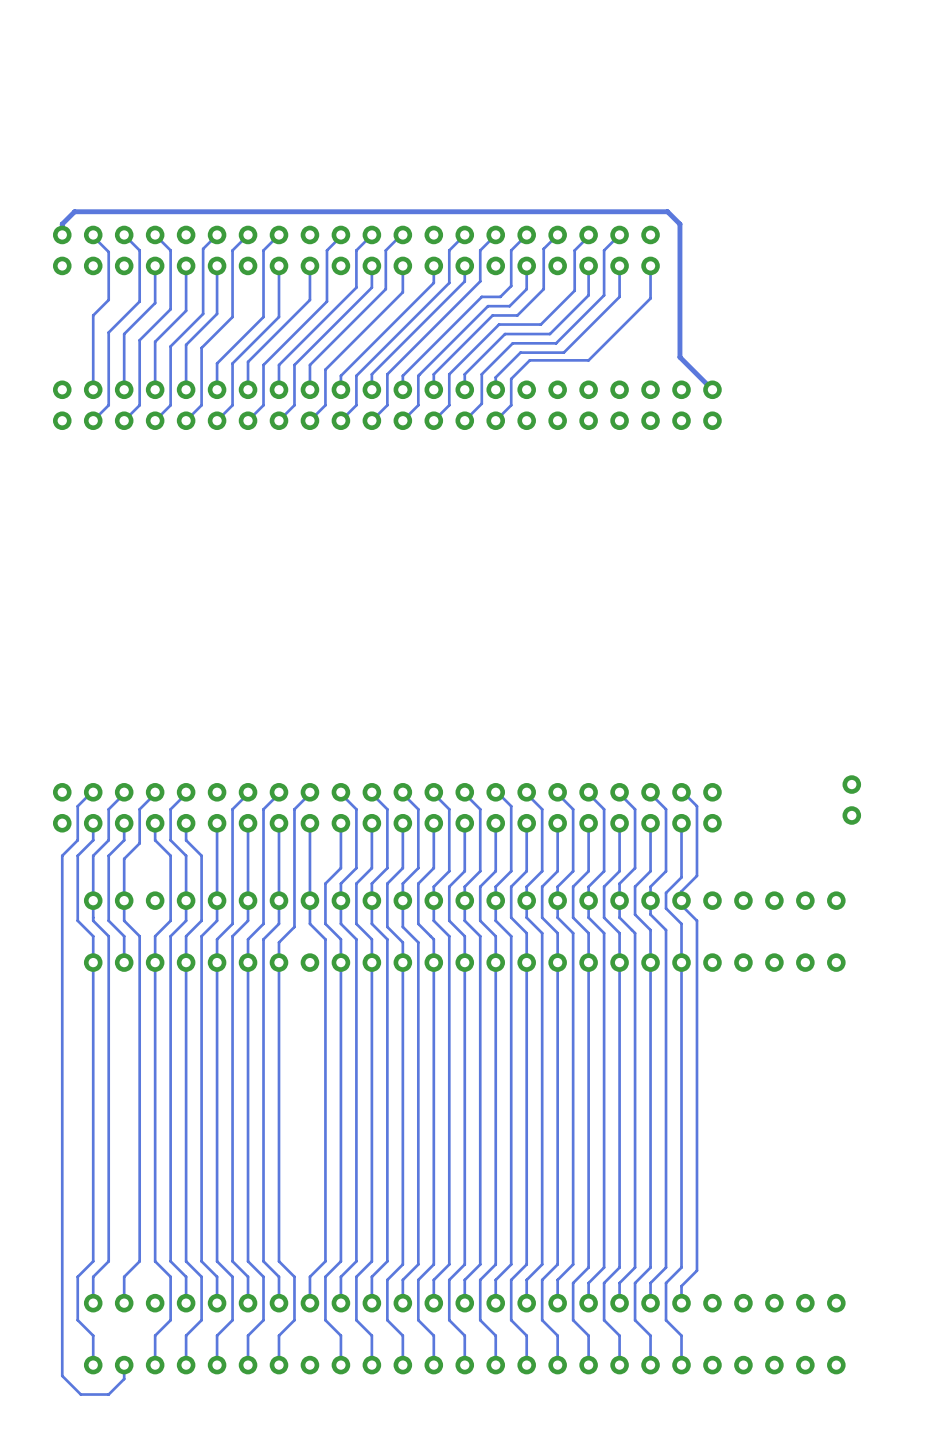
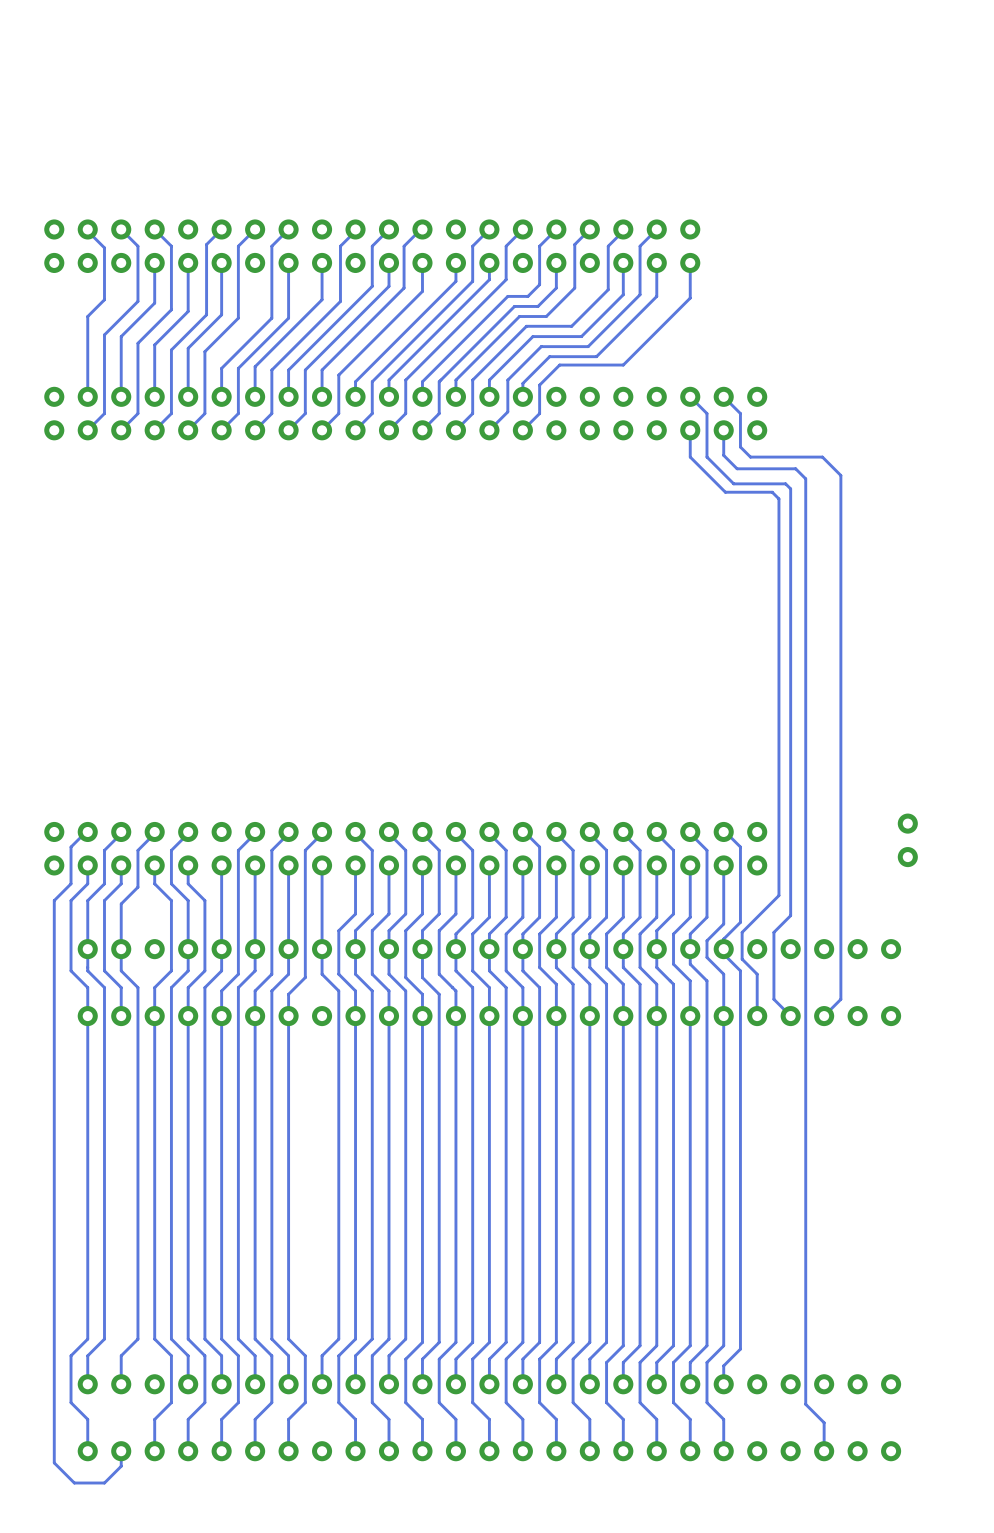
track: (62, 234) (62, 224) (74, 211) (667, 211) (679, 224) (679, 357) (712, 389) -> none
track: none -> (690, 396) (706, 413) (706, 457) (733, 483) (785, 483) (790, 488) (790, 915) (773, 932) (773, 999) (790, 1016)
track: none -> (723, 396) (740, 413) (740, 447) (750, 457) (822, 457) (840, 475) (840, 999) (824, 1016)
track: none -> (690, 430) (690, 457) (725, 492) (772, 492) (778, 498) (778, 895) (742, 932) (742, 959) (757, 974) (757, 1016)
track: none -> (723, 430) (723, 455) (737, 468) (795, 468) (805, 478) (805, 1404) (824, 1422) (824, 1451)

